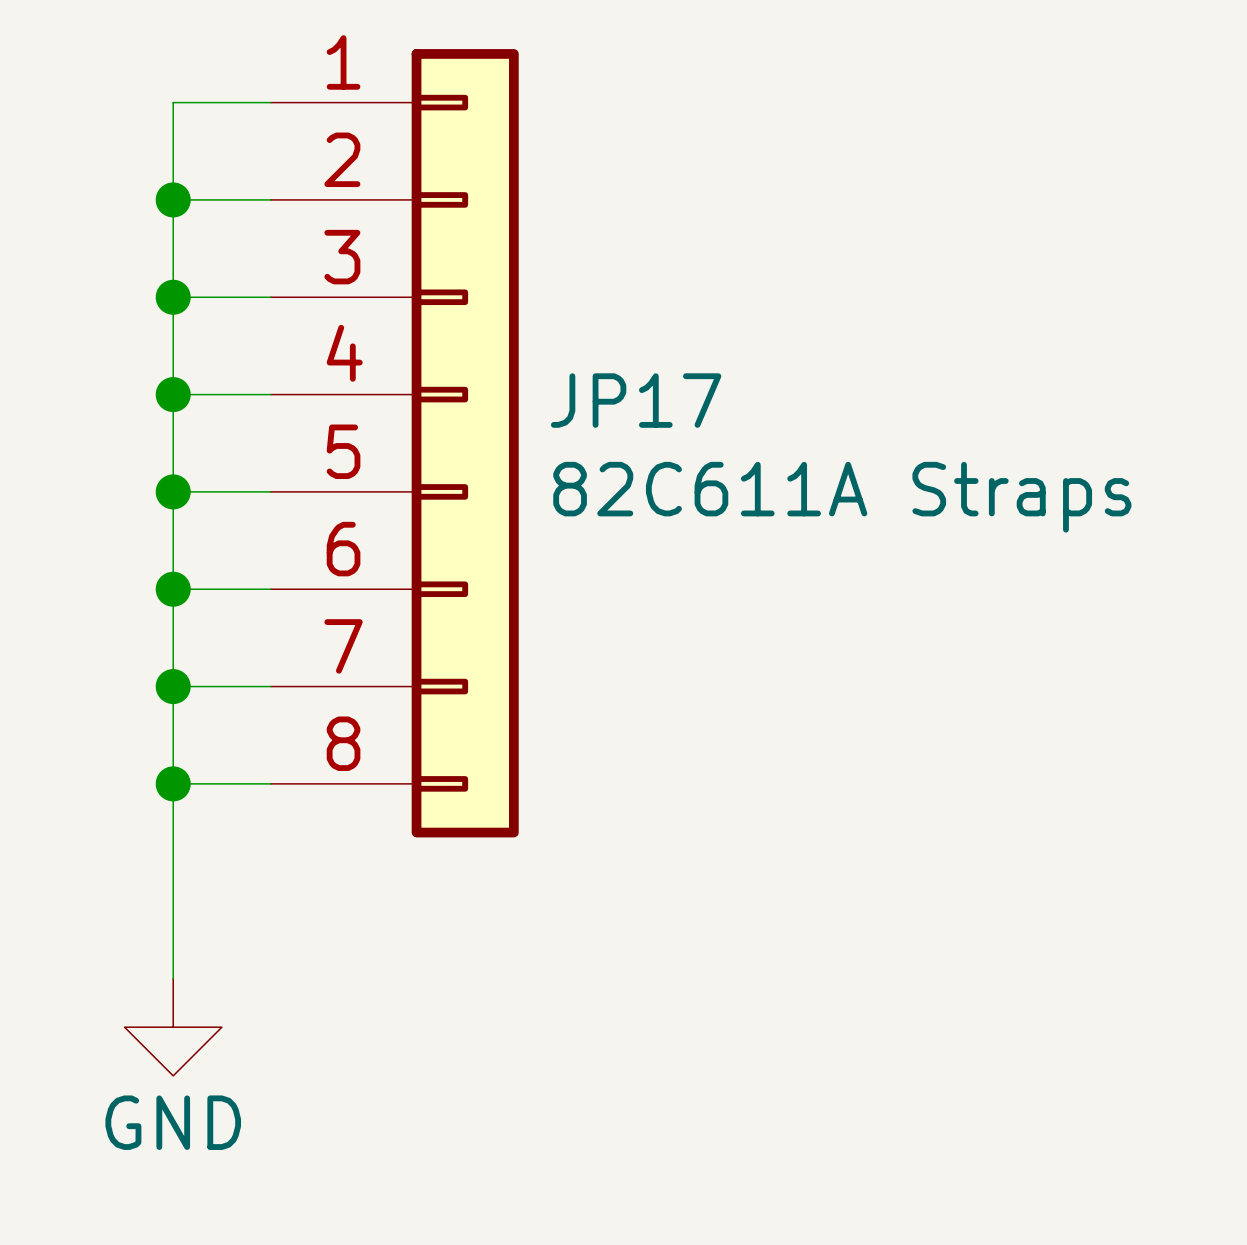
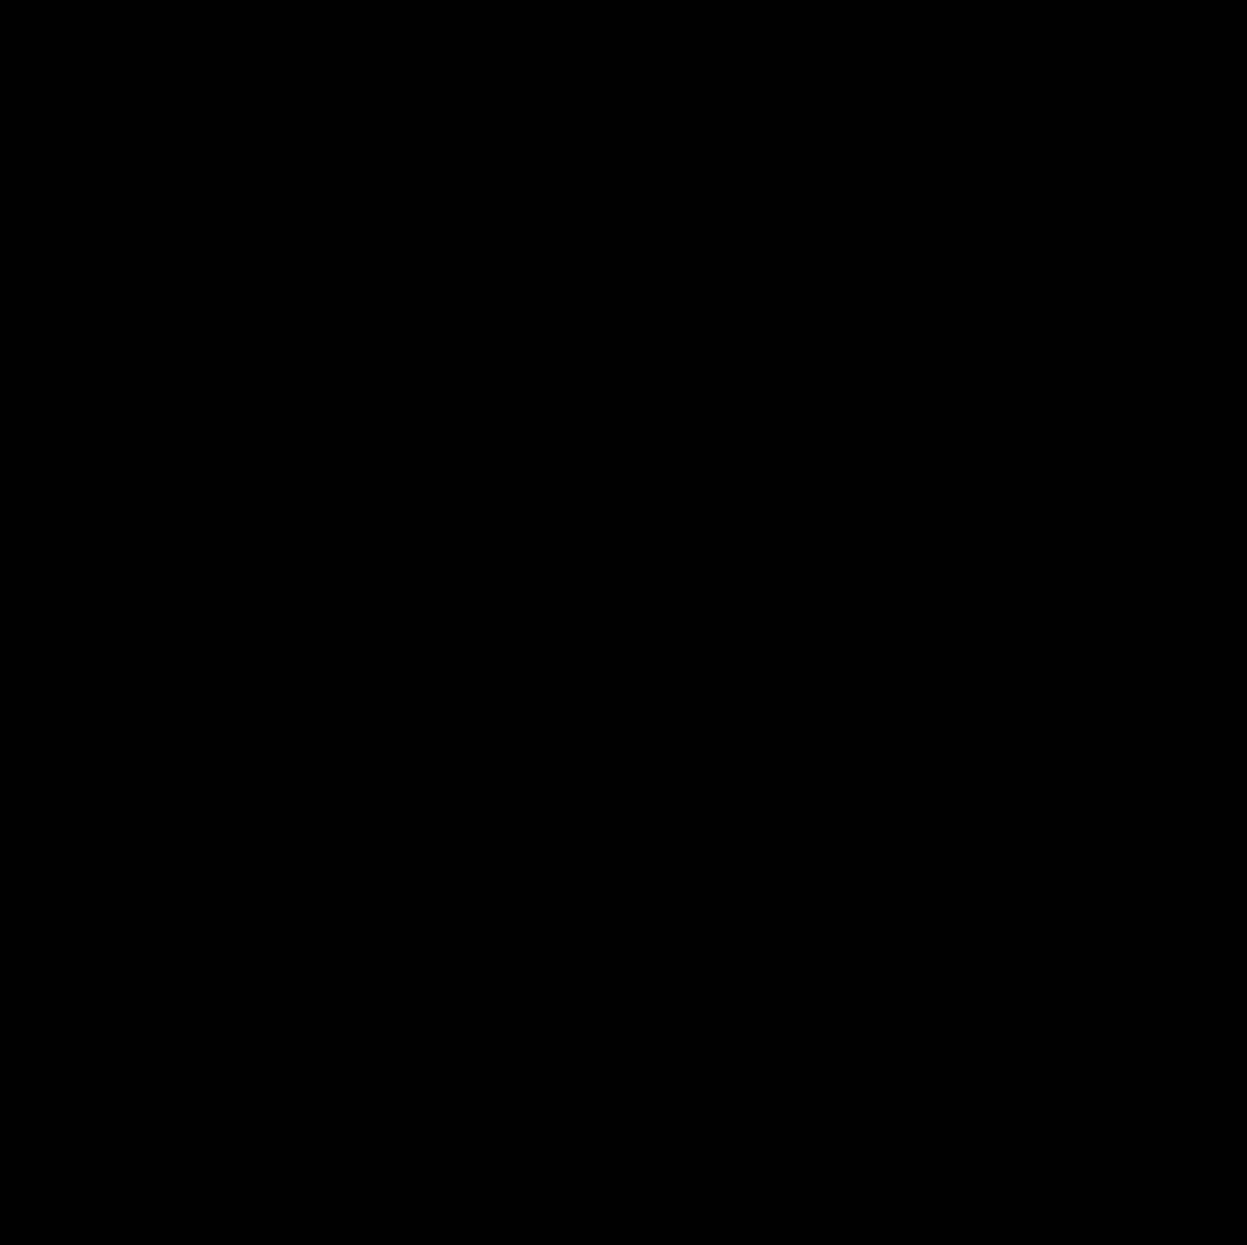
wire: (270, 102) (173, 102) (173, 978) -> none
wire: (173, 199) (270, 199) -> none
junction: (173, 199) -> none
wire: (173, 297) (270, 297) -> none
junction: (173, 297) -> none
wire: (173, 394) (270, 394) -> none
junction: (173, 394) -> none
JP17: 82C611A Straps (394, 443) -> none
wire: (173, 491) (270, 491) -> none
junction: (173, 491) -> none
wire: (173, 589) (270, 589) -> none
junction: (173, 589) -> none
wire: (173, 686) (270, 686) -> none
junction: (173, 686) -> none
wire: (173, 783) (270, 783) -> none
junction: (173, 783) -> none
power symbol: GND (173, 1027) -> none

